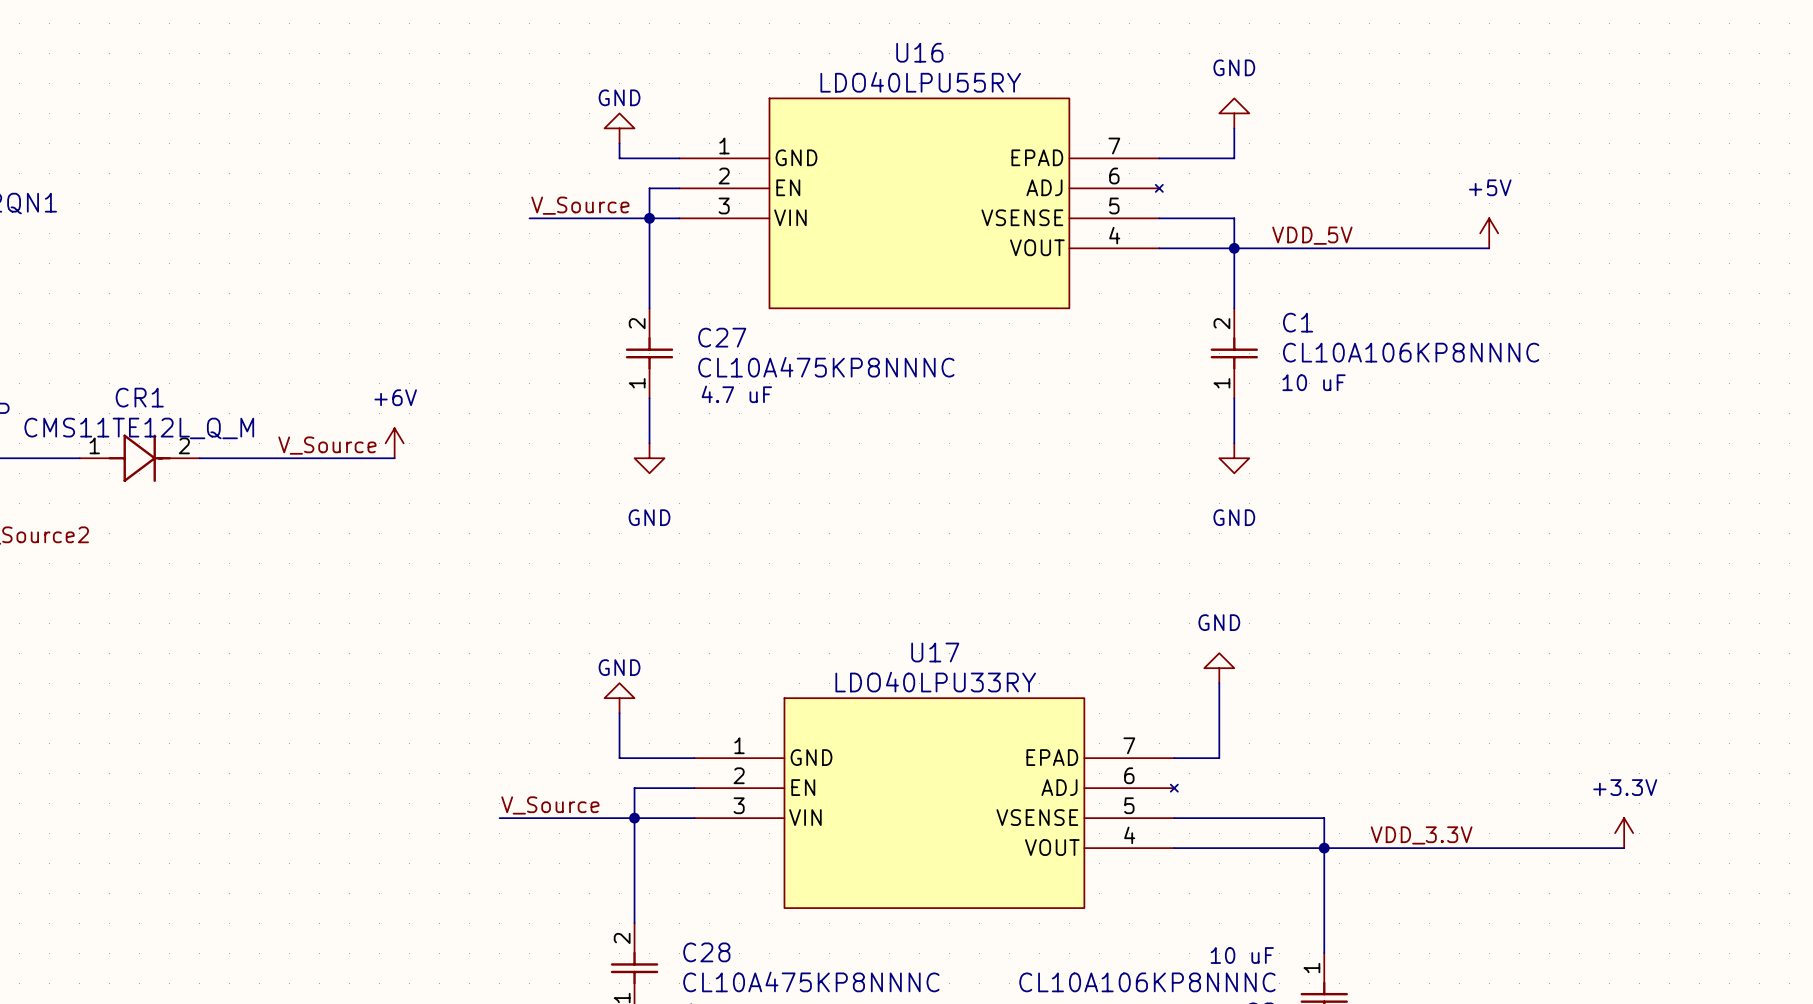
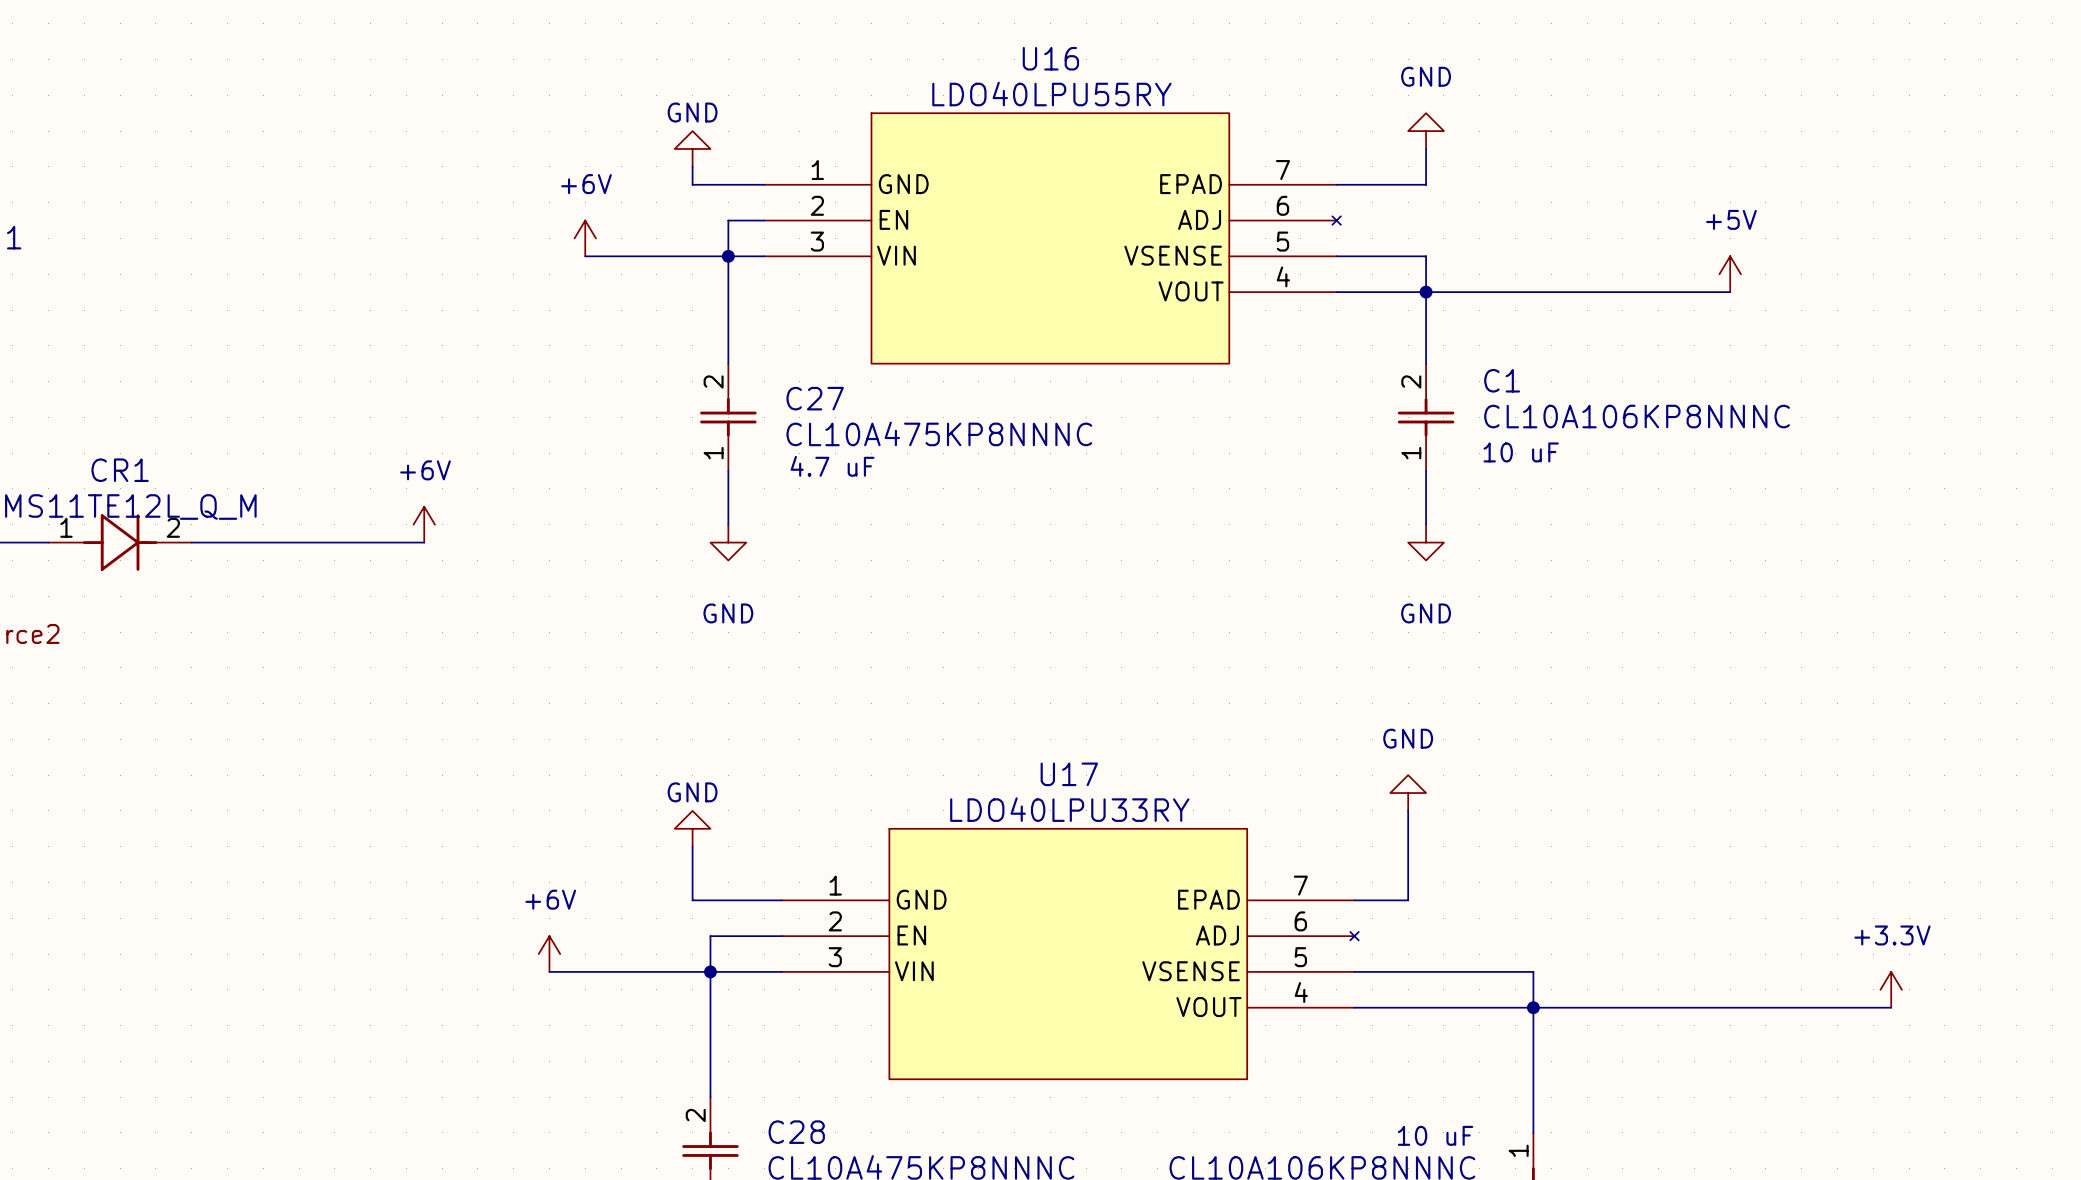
power symbol: none -> +6V (585, 238)
label: V_Source (580, 205) -> none
label: VDD_5V (1312, 235) -> none
label: V_Source (327, 445) -> none
power symbol: none -> +6V (549, 954)
label: V_Source (550, 805) -> none
label: VDD_3.3V (1421, 835) -> none

